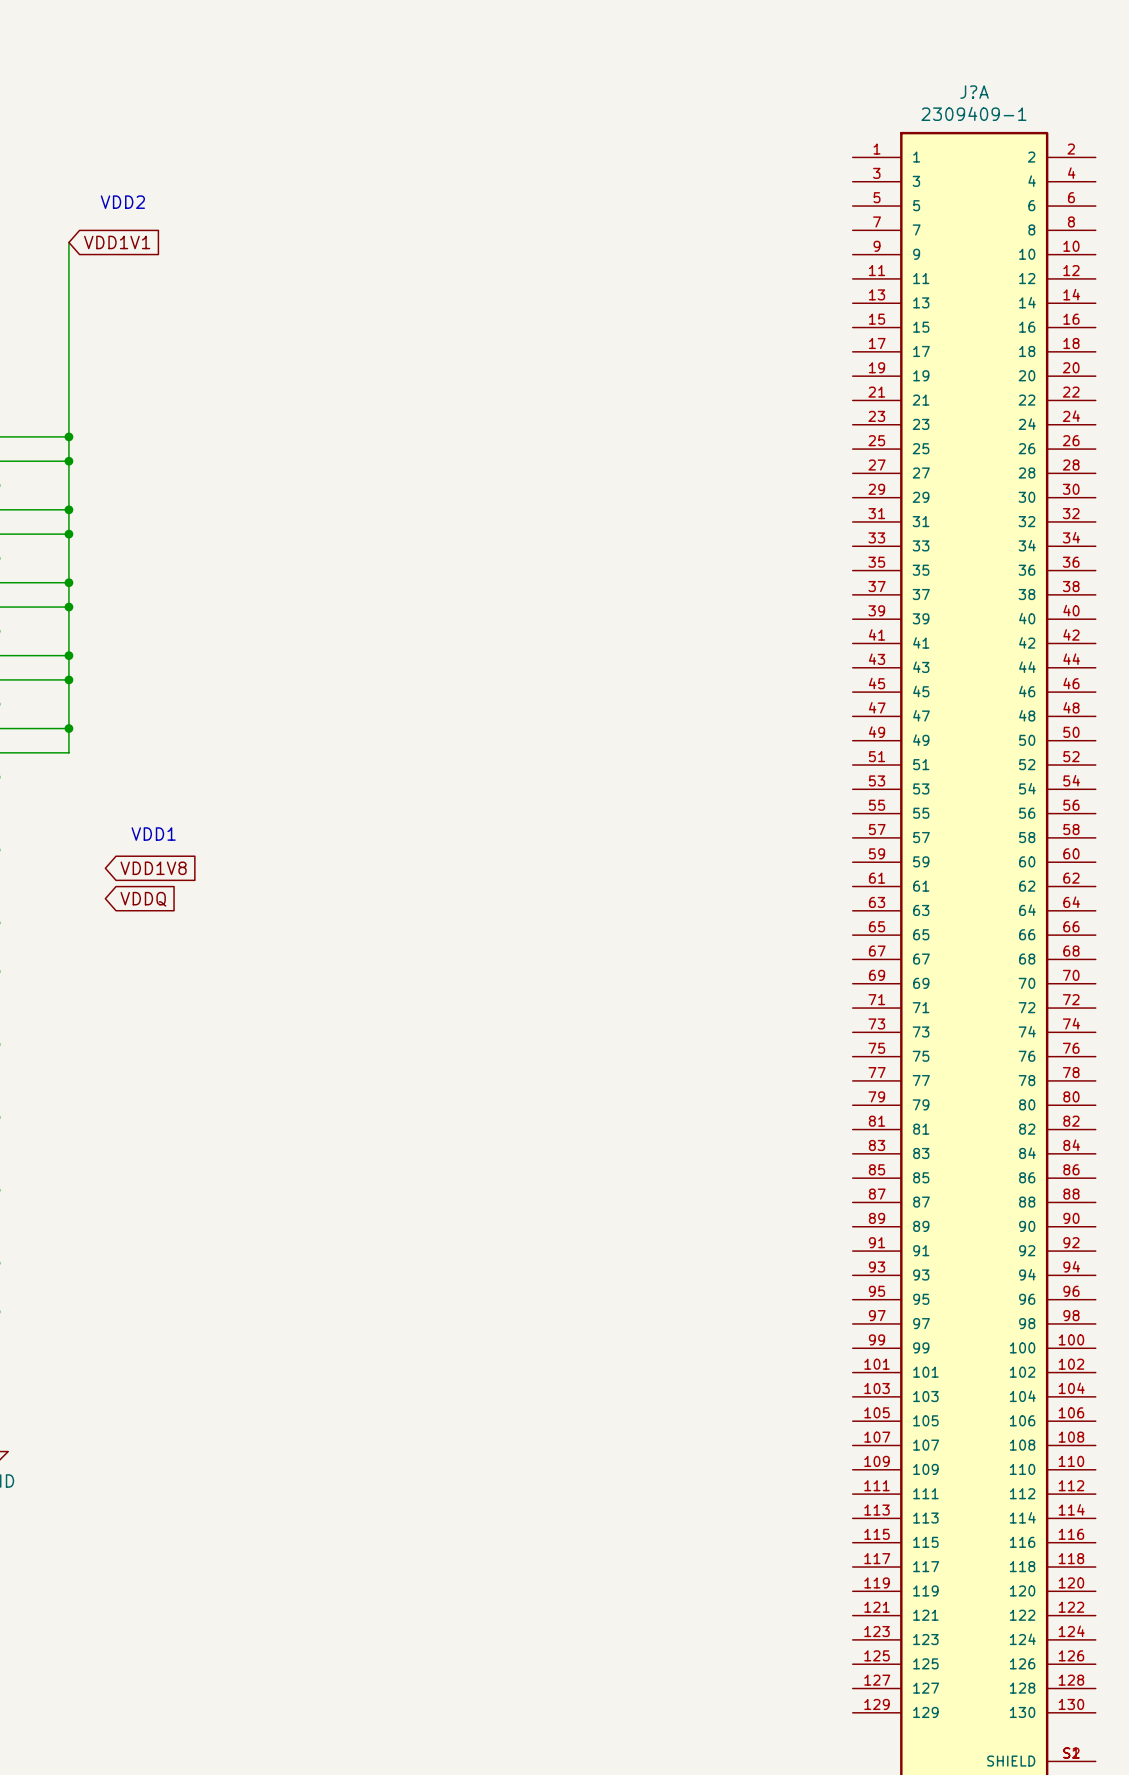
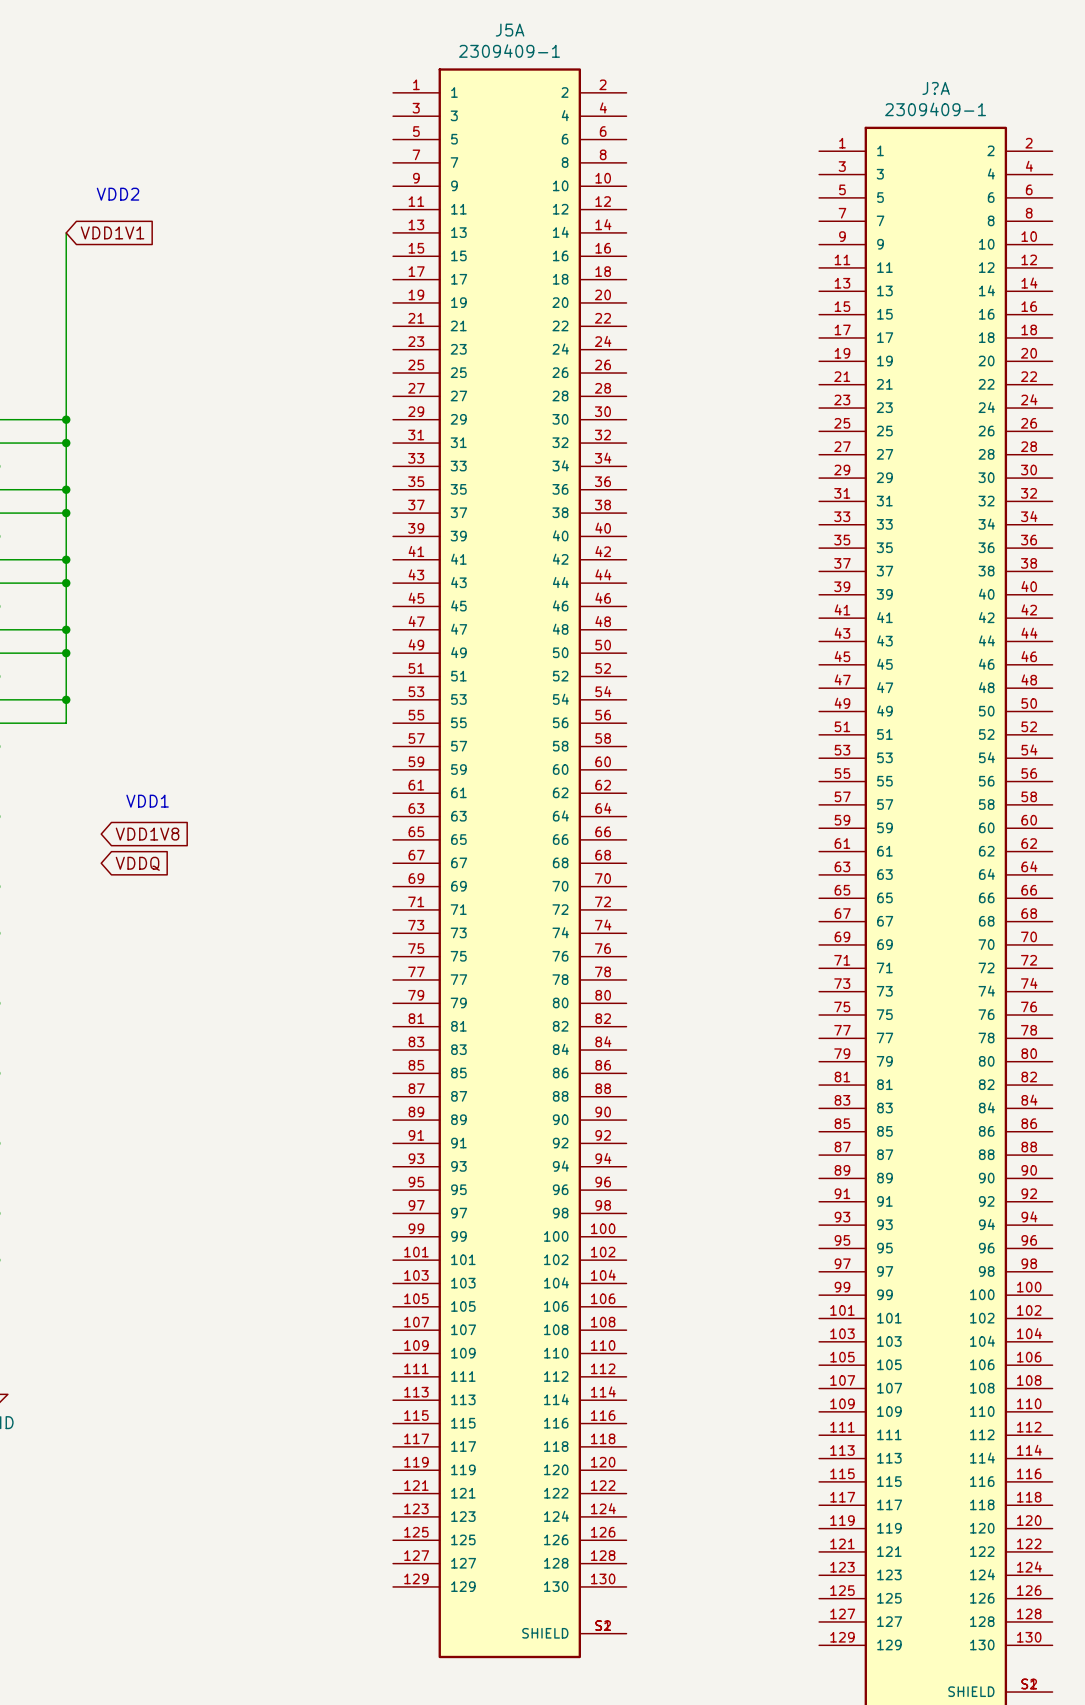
J5A: none -> 2309409-1 (509, 863)

